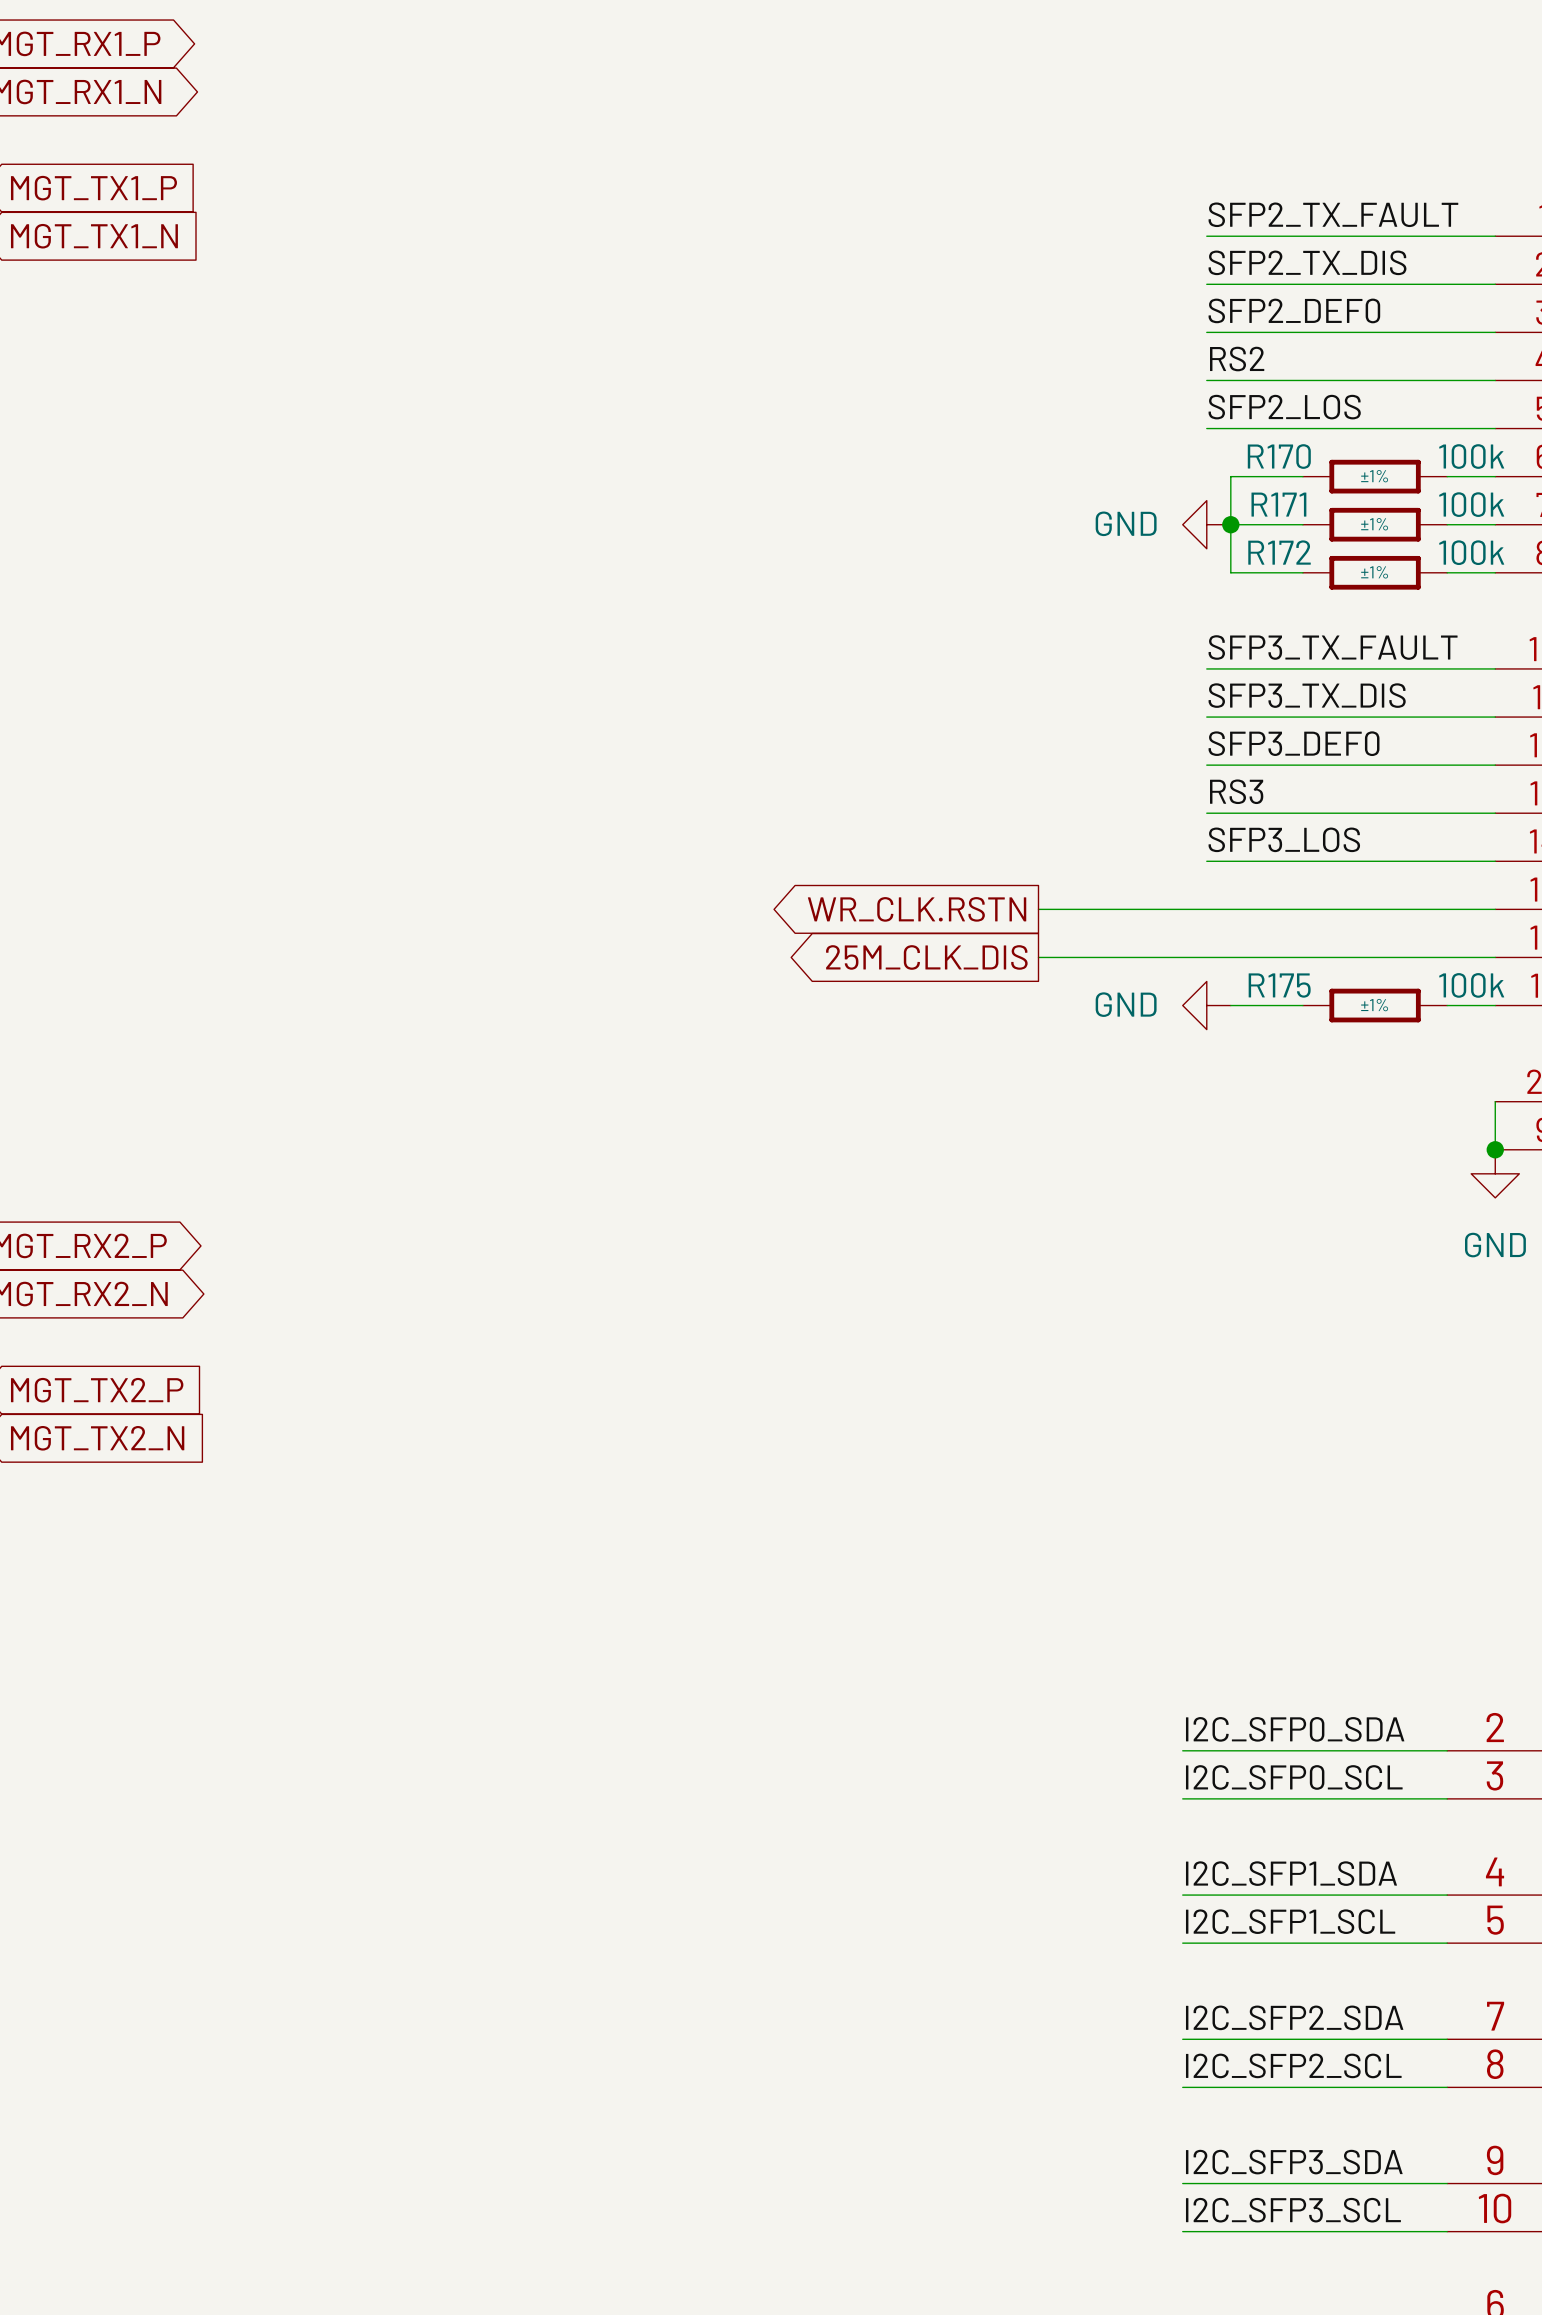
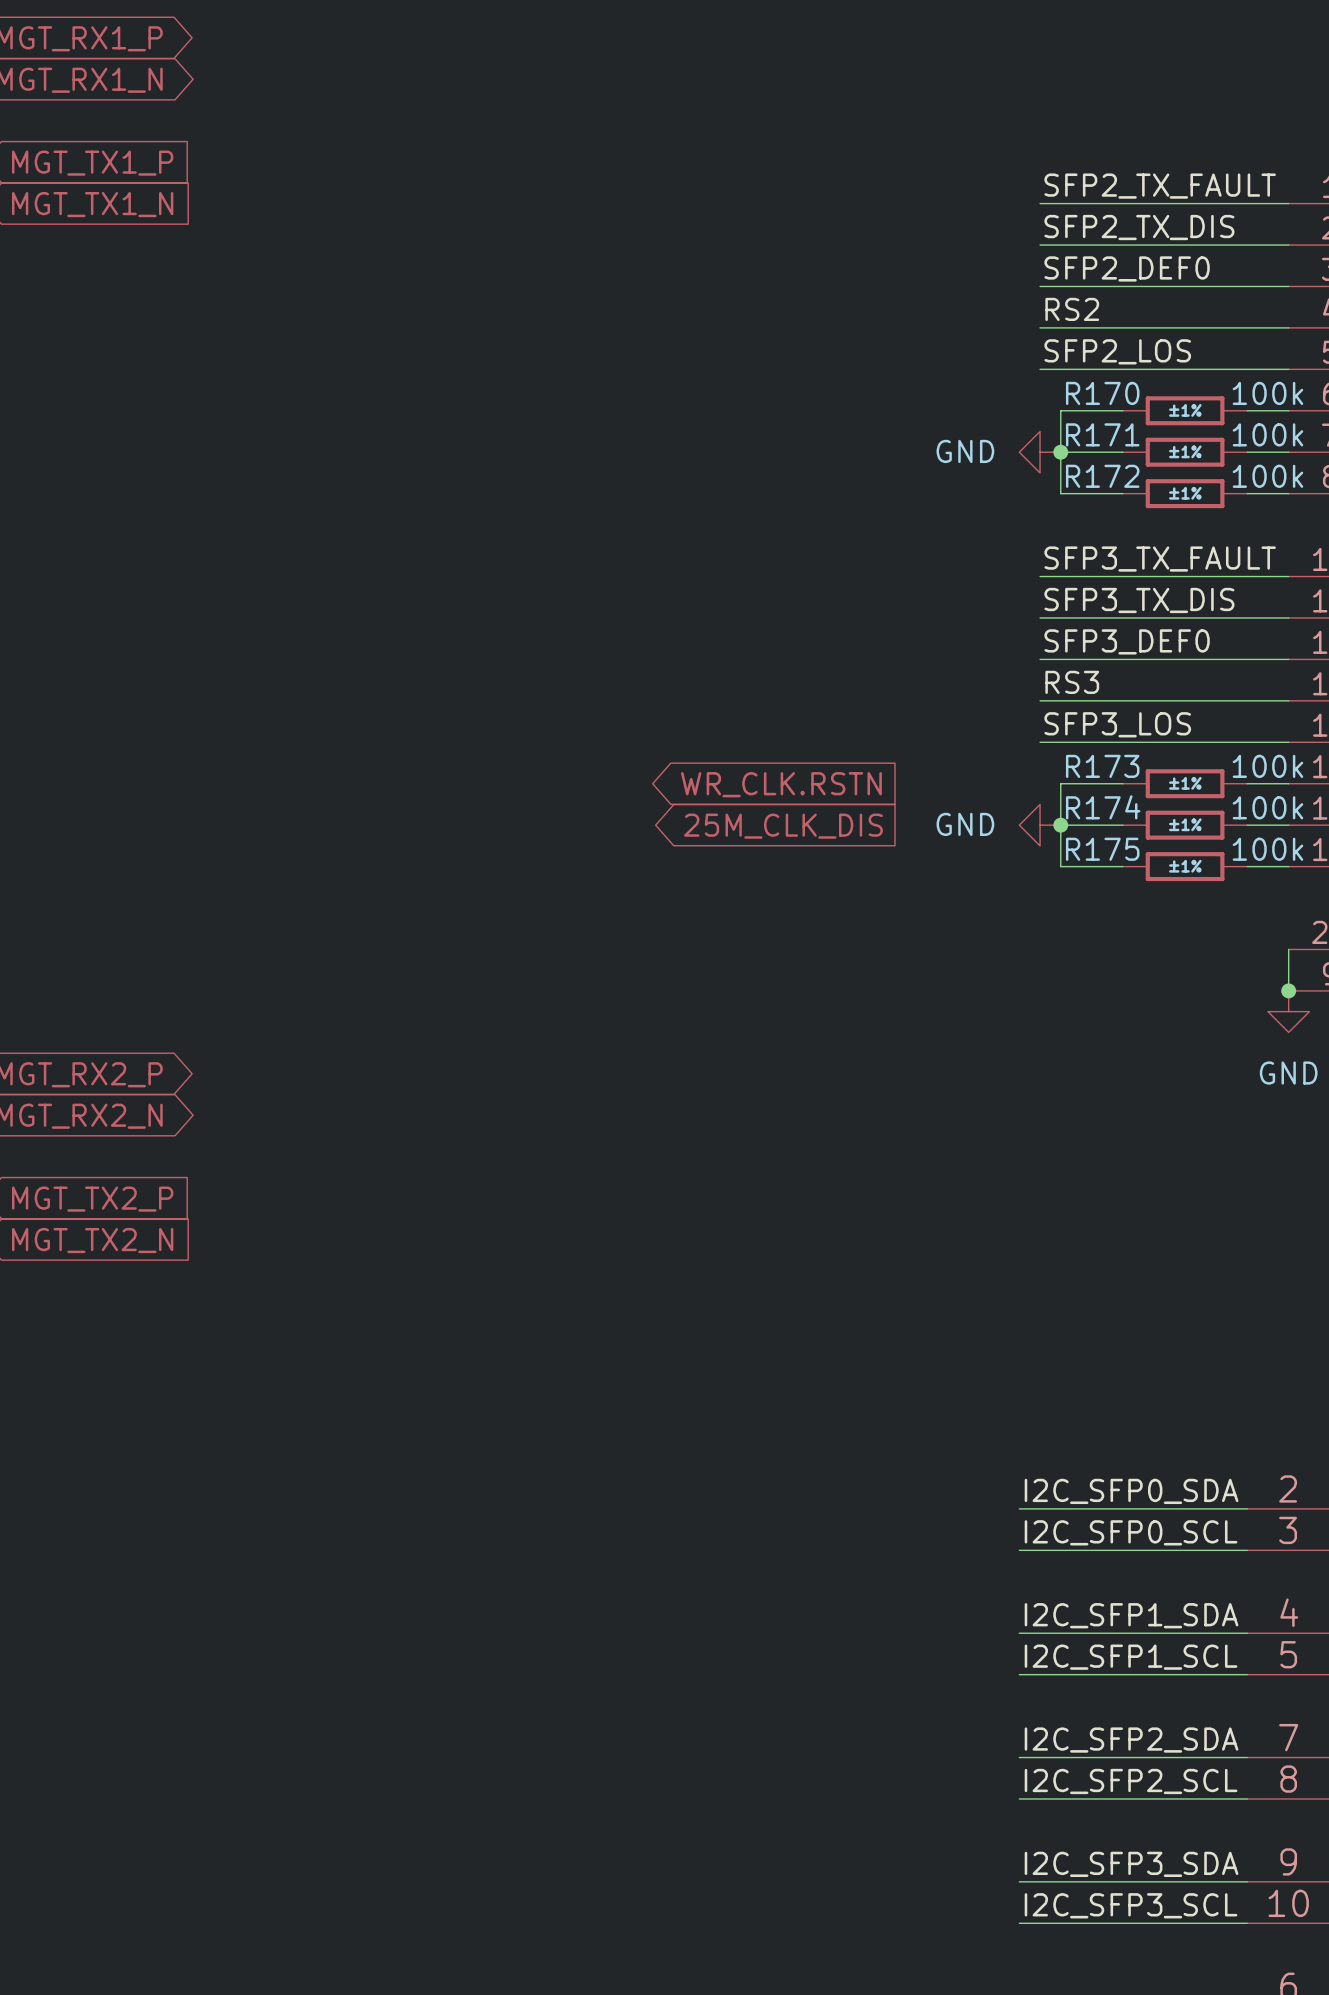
wire: (1038, 909) (1230, 909) -> (1060, 866) (1060, 783)
wire: (1302, 909) (1447, 909) -> none
R173: none -> (1185, 783)
wire: (1038, 957) (1230, 957) -> none
junction: none -> (1060, 825)
wire: (1302, 957) (1447, 957) -> none
R174: none -> (1185, 825)
power symbol position: GND (1206, 1005) -> GND (1040, 825)

